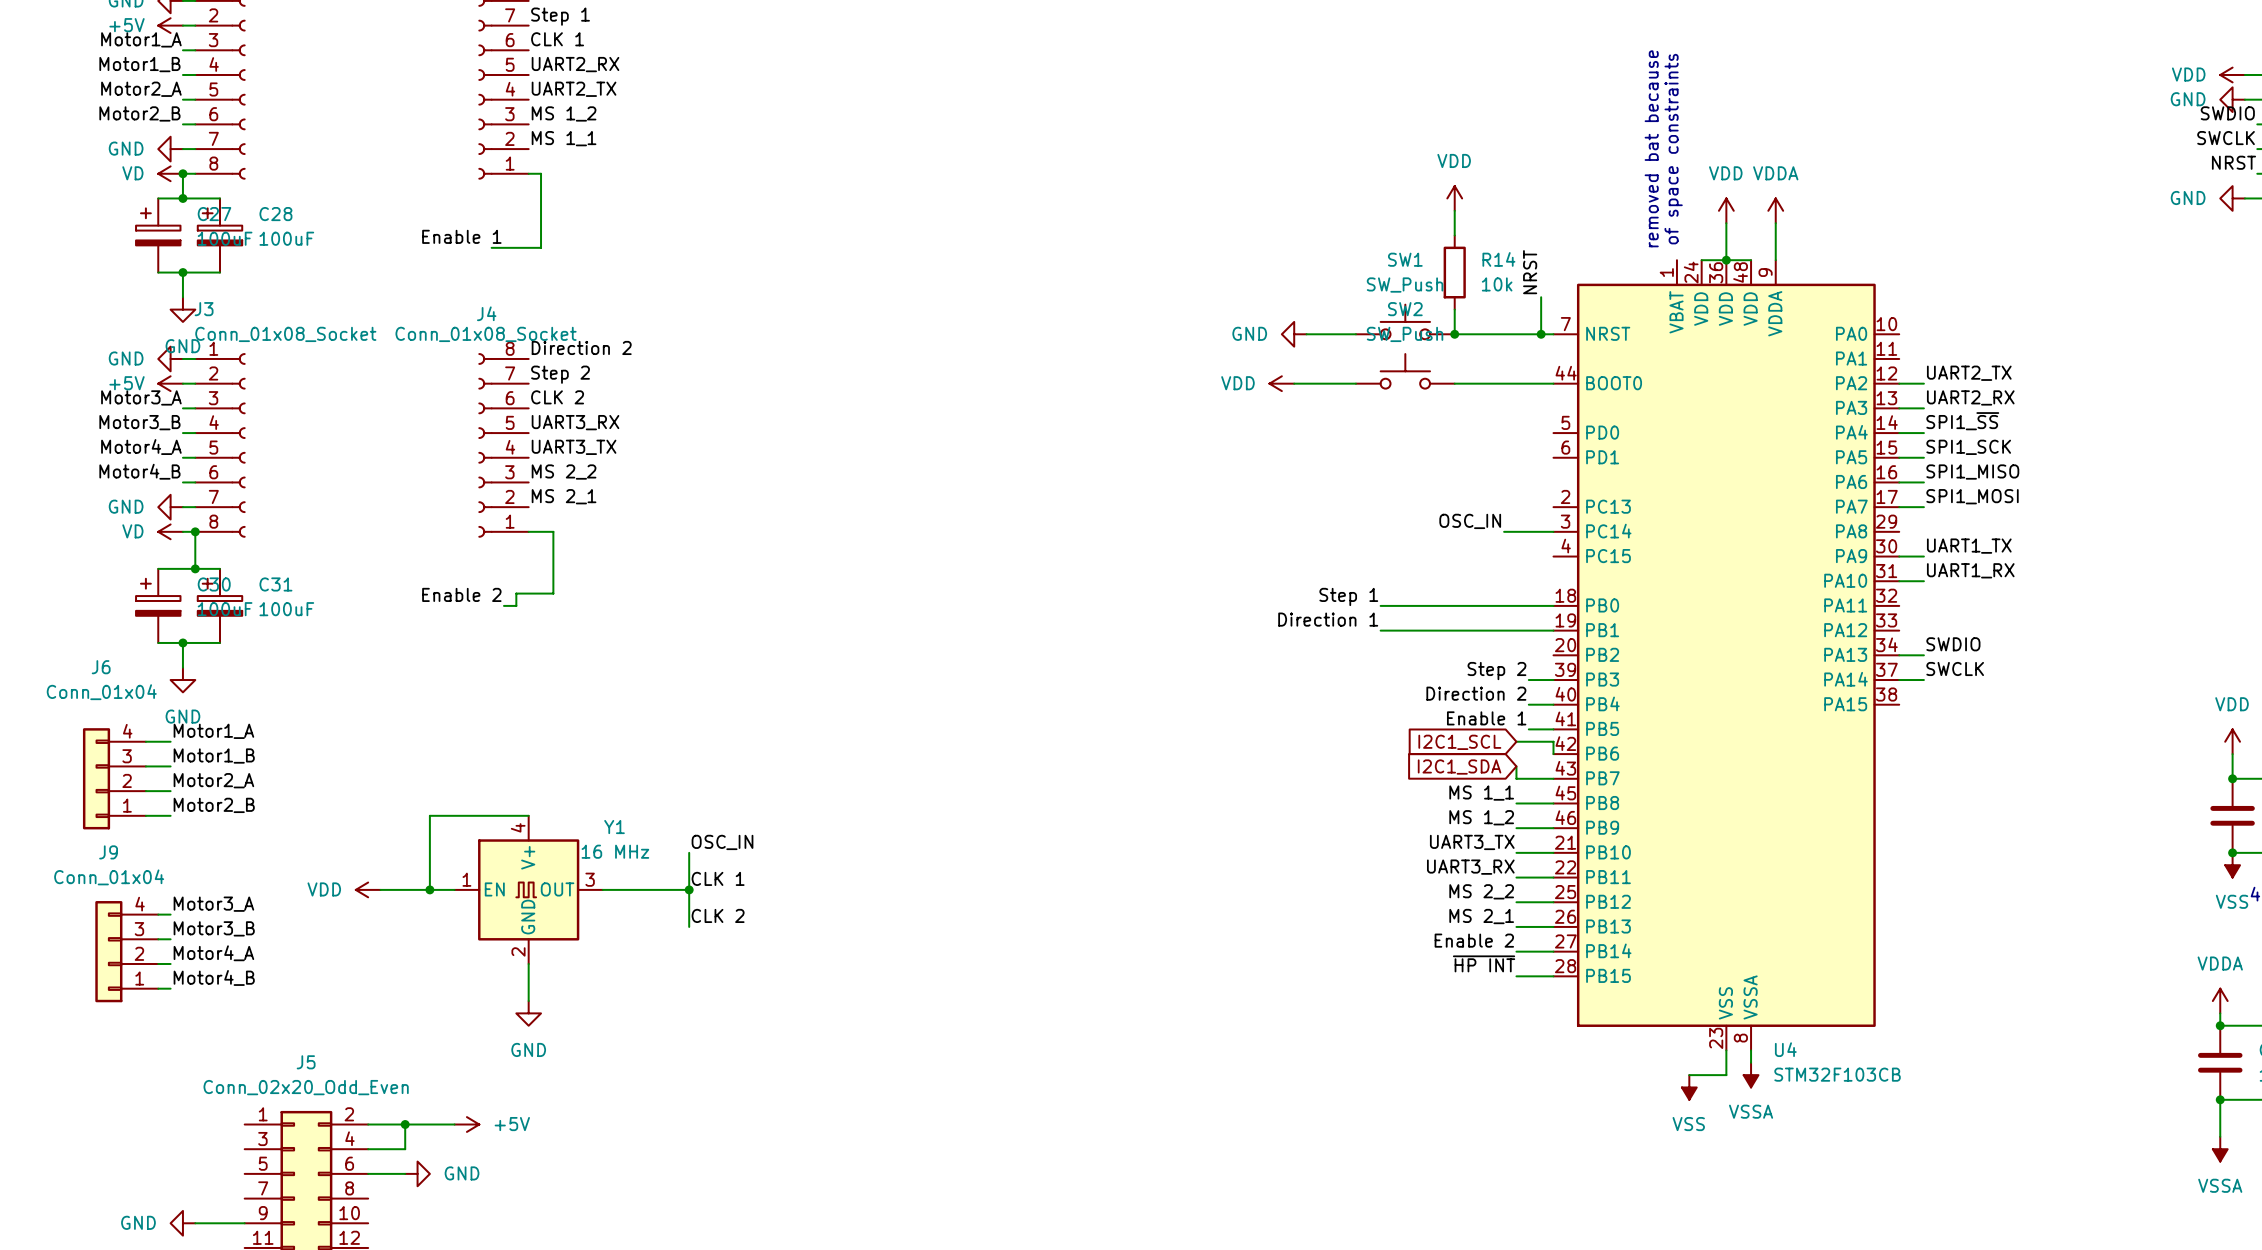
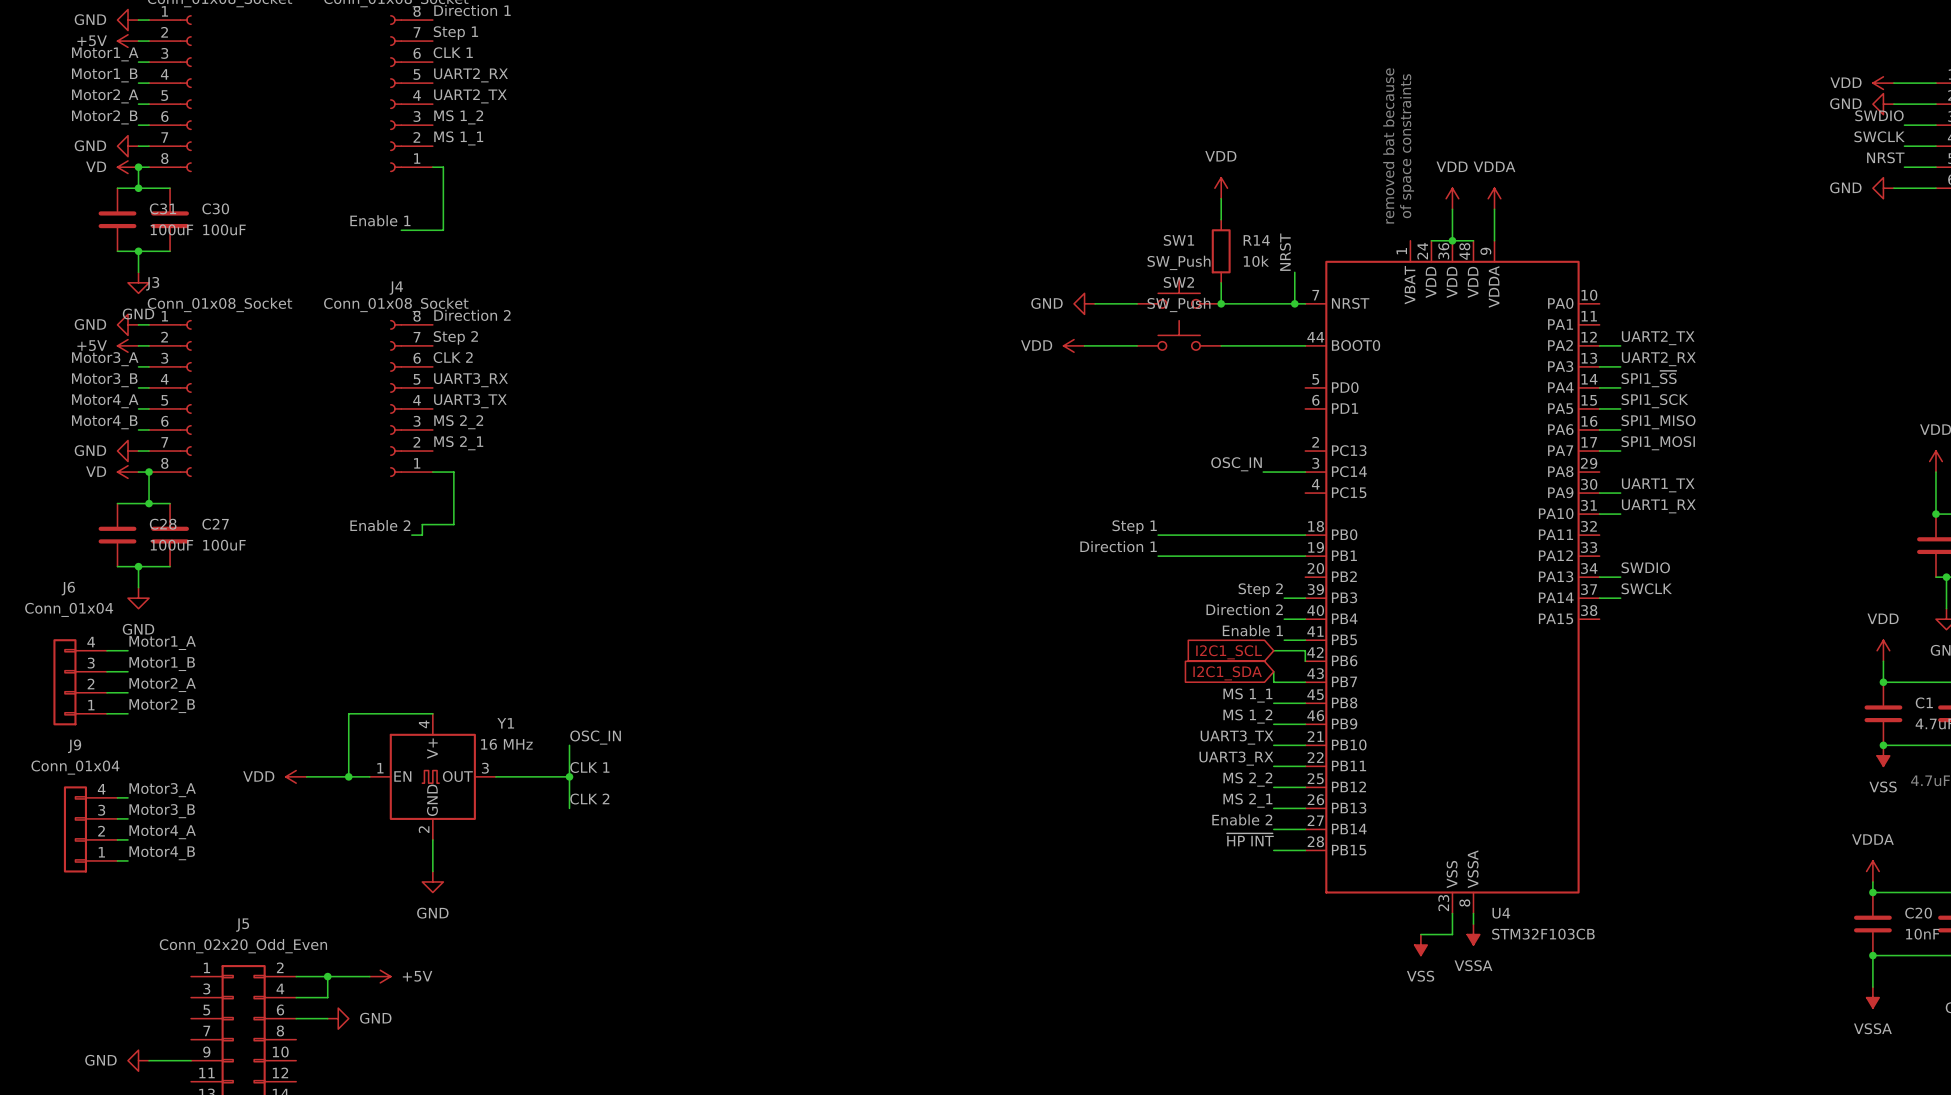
C27 symbol: [136, 198, 181, 273] -> [151, 503, 189, 567]
C28 symbol: [197, 198, 243, 273] -> [98, 503, 137, 567]
C30 symbol: [136, 568, 181, 643] -> [151, 188, 189, 252]
C31 symbol: [197, 568, 243, 643] -> [98, 188, 137, 252]

